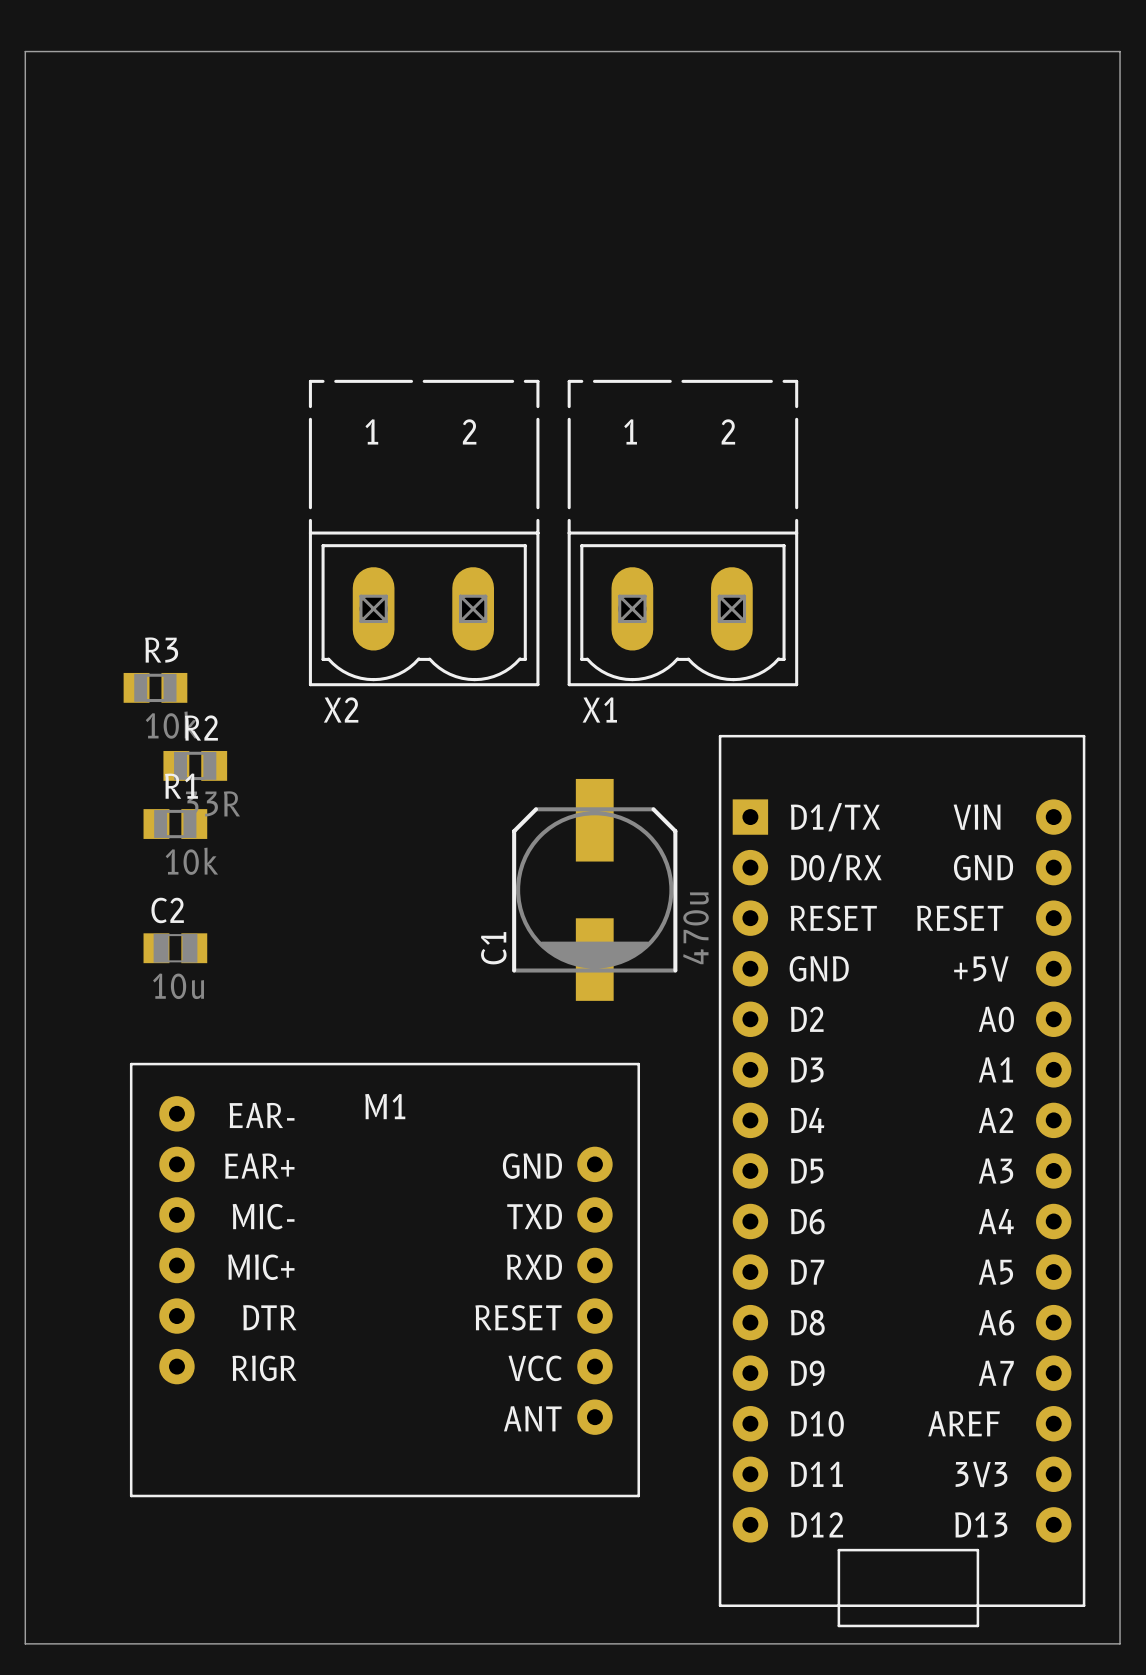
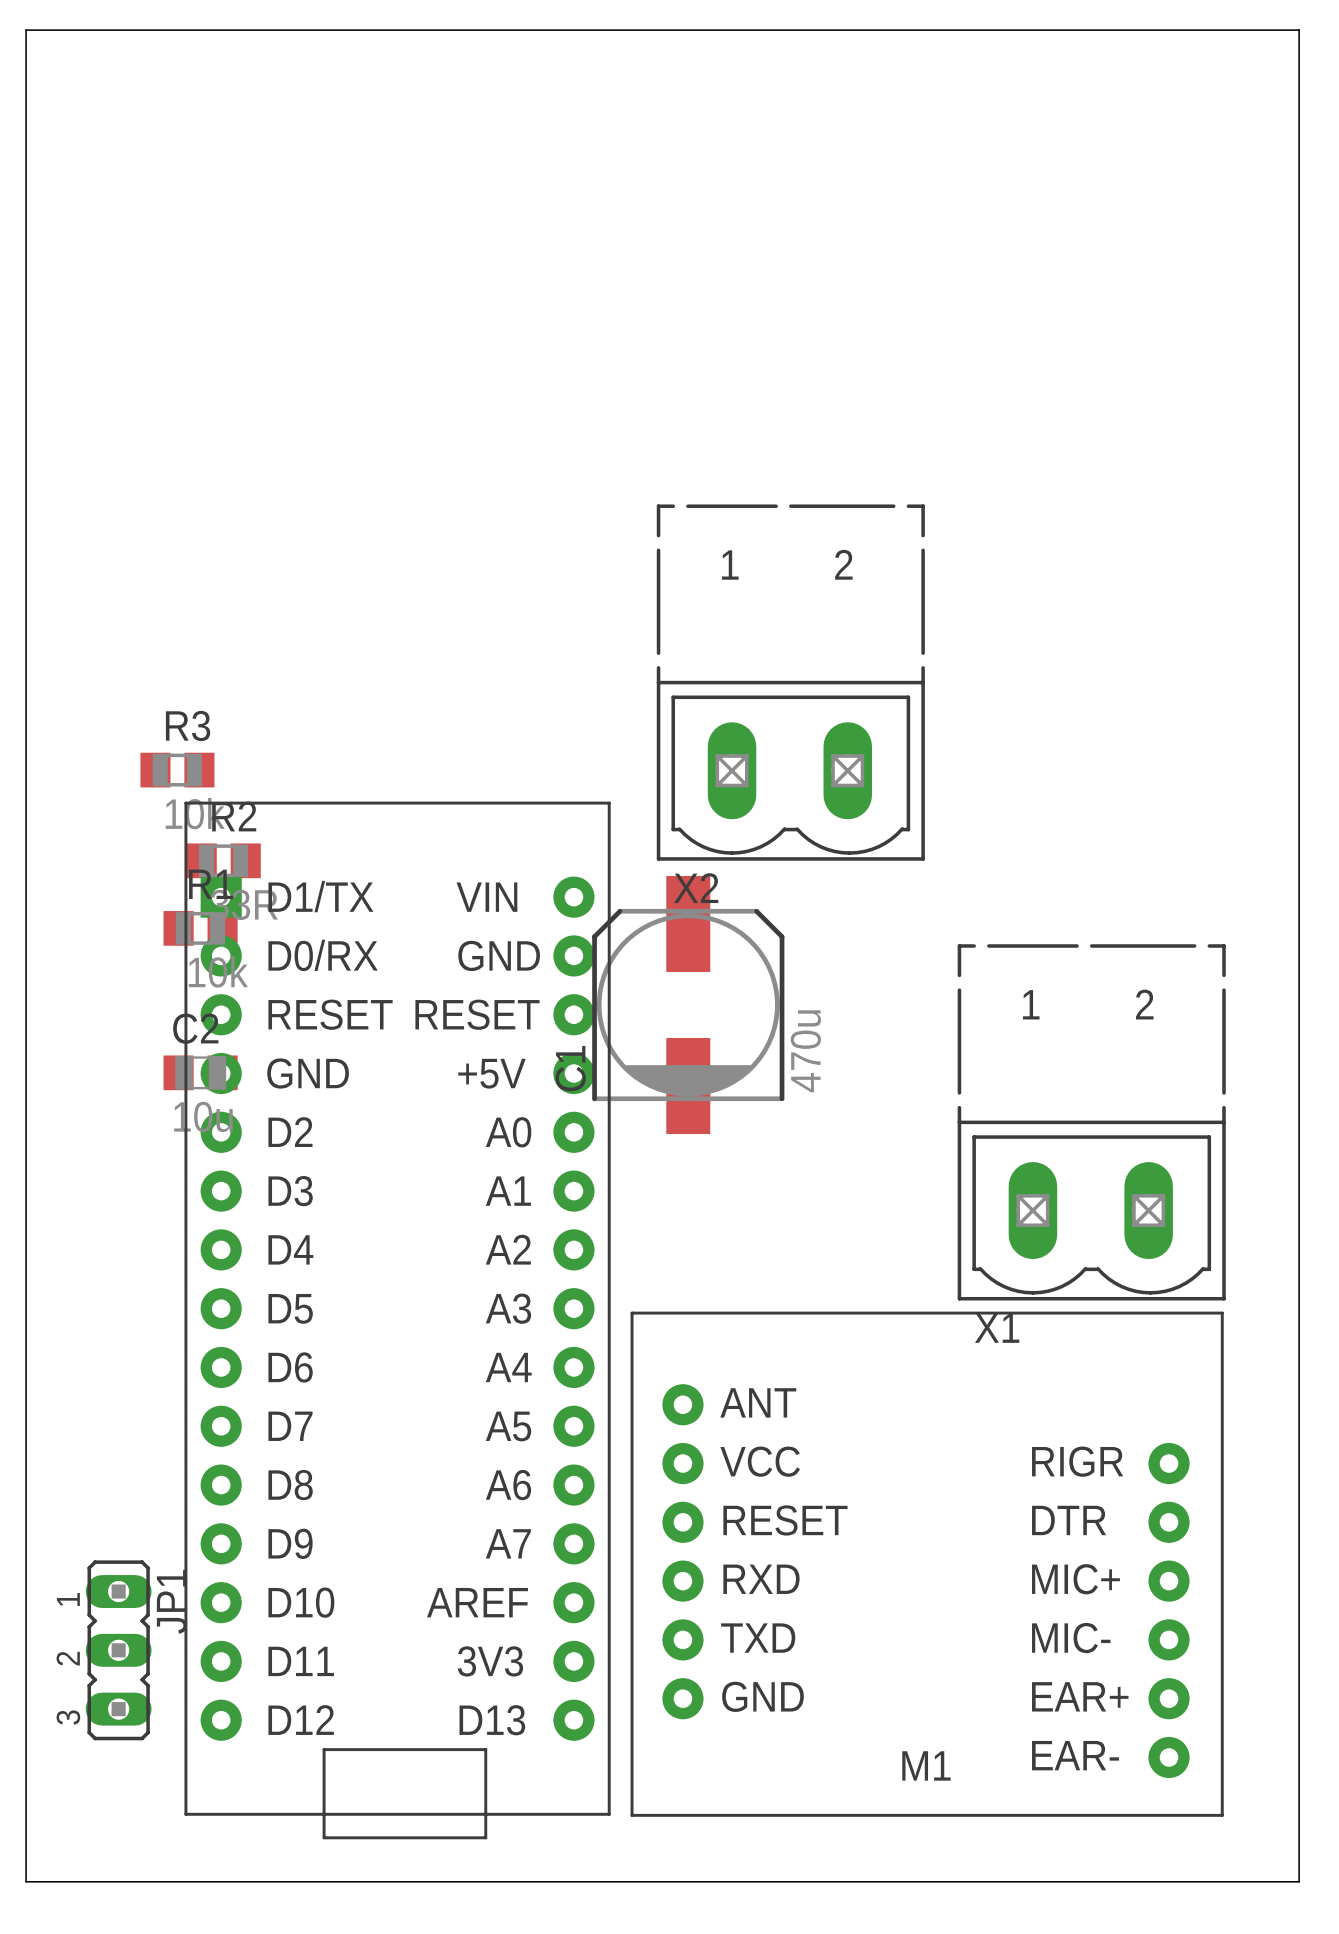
X2 position: (424, 533) -> (790, 682)
X1 position: (682, 533) -> (1091, 1122)
M1 footprint: [129, 1062, 641, 1498] -> [630, 1311, 1224, 1817]
M1 name position: M1 (385, 1106) -> M1 (926, 1765)
part: none -> (397, 1320)
part: (902, 1181) -> none
JP1: none -> (118, 1650)

